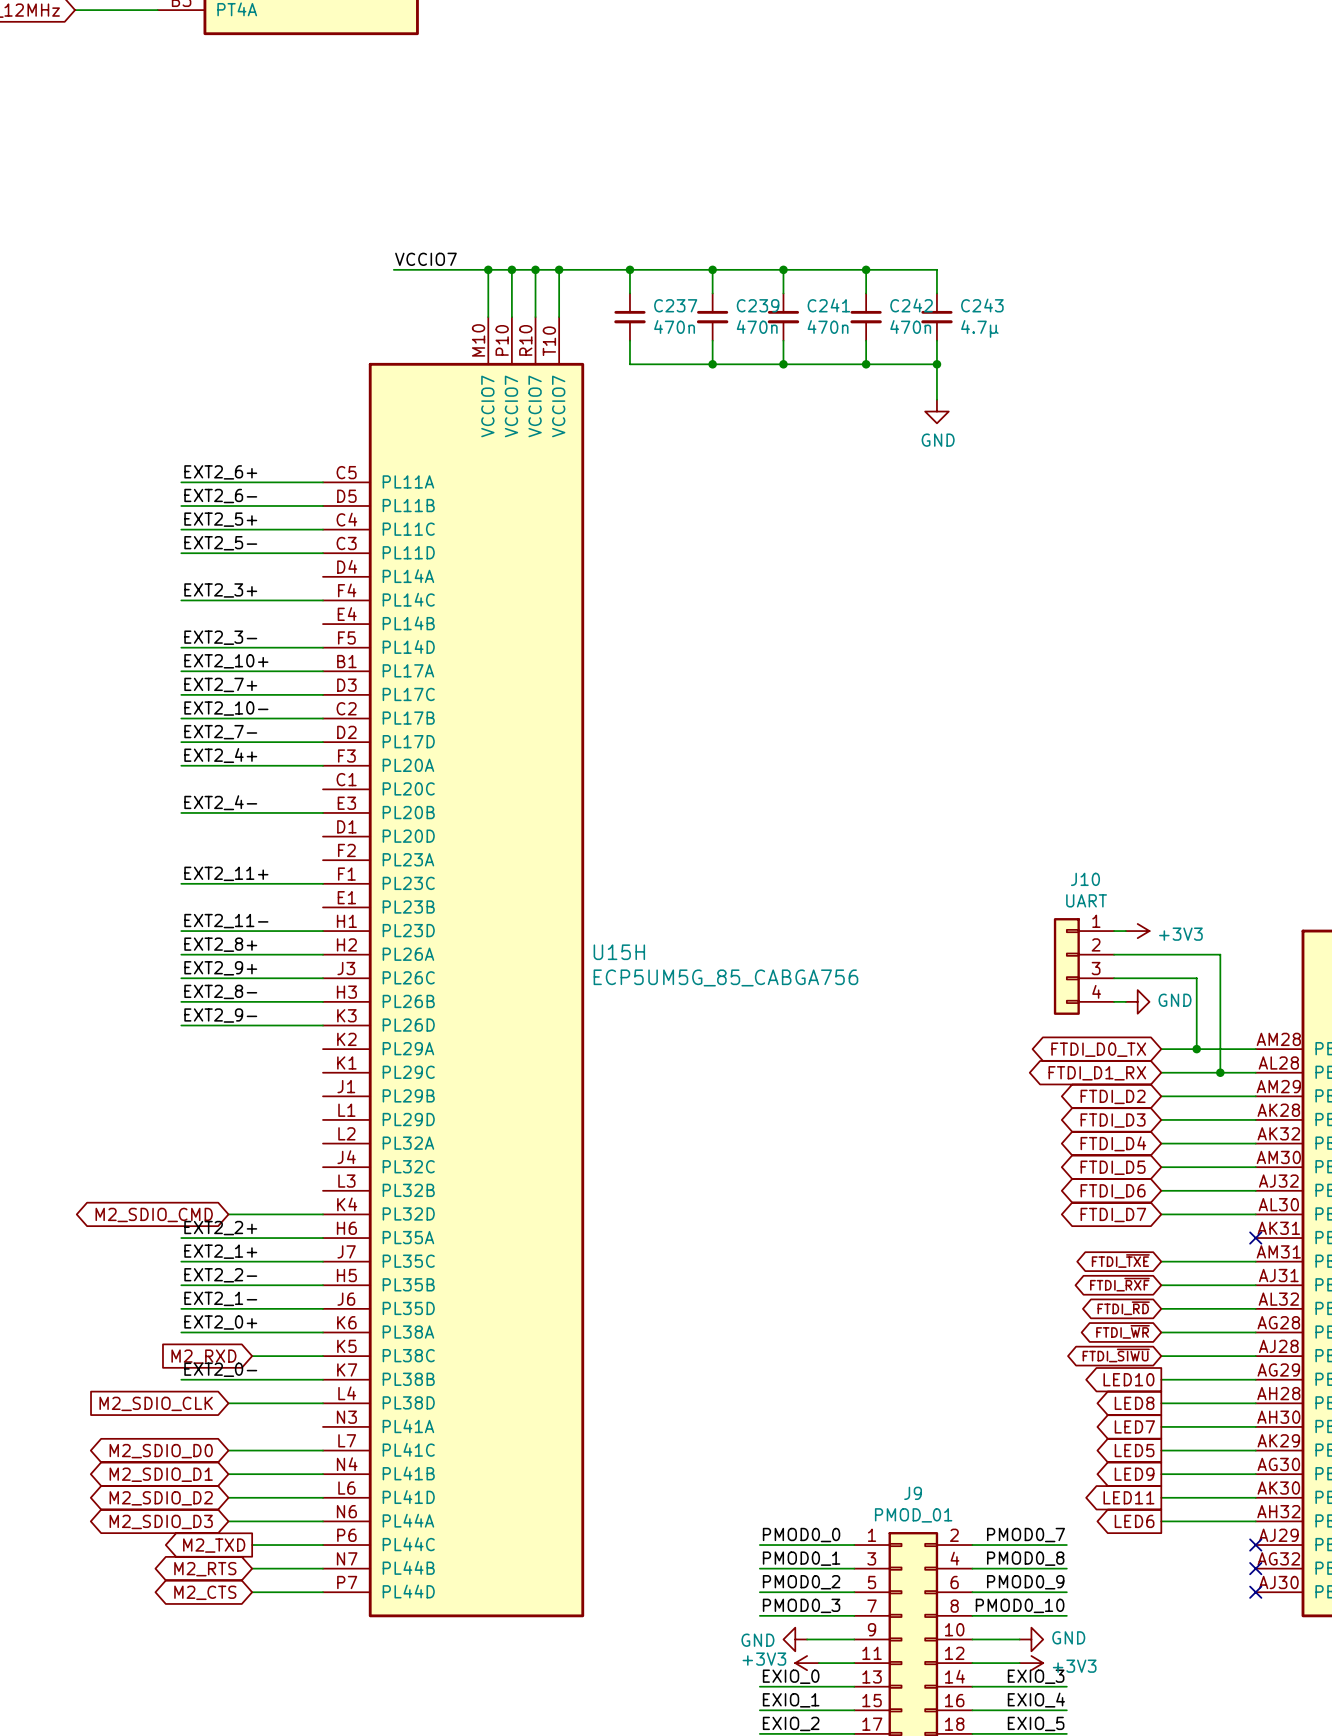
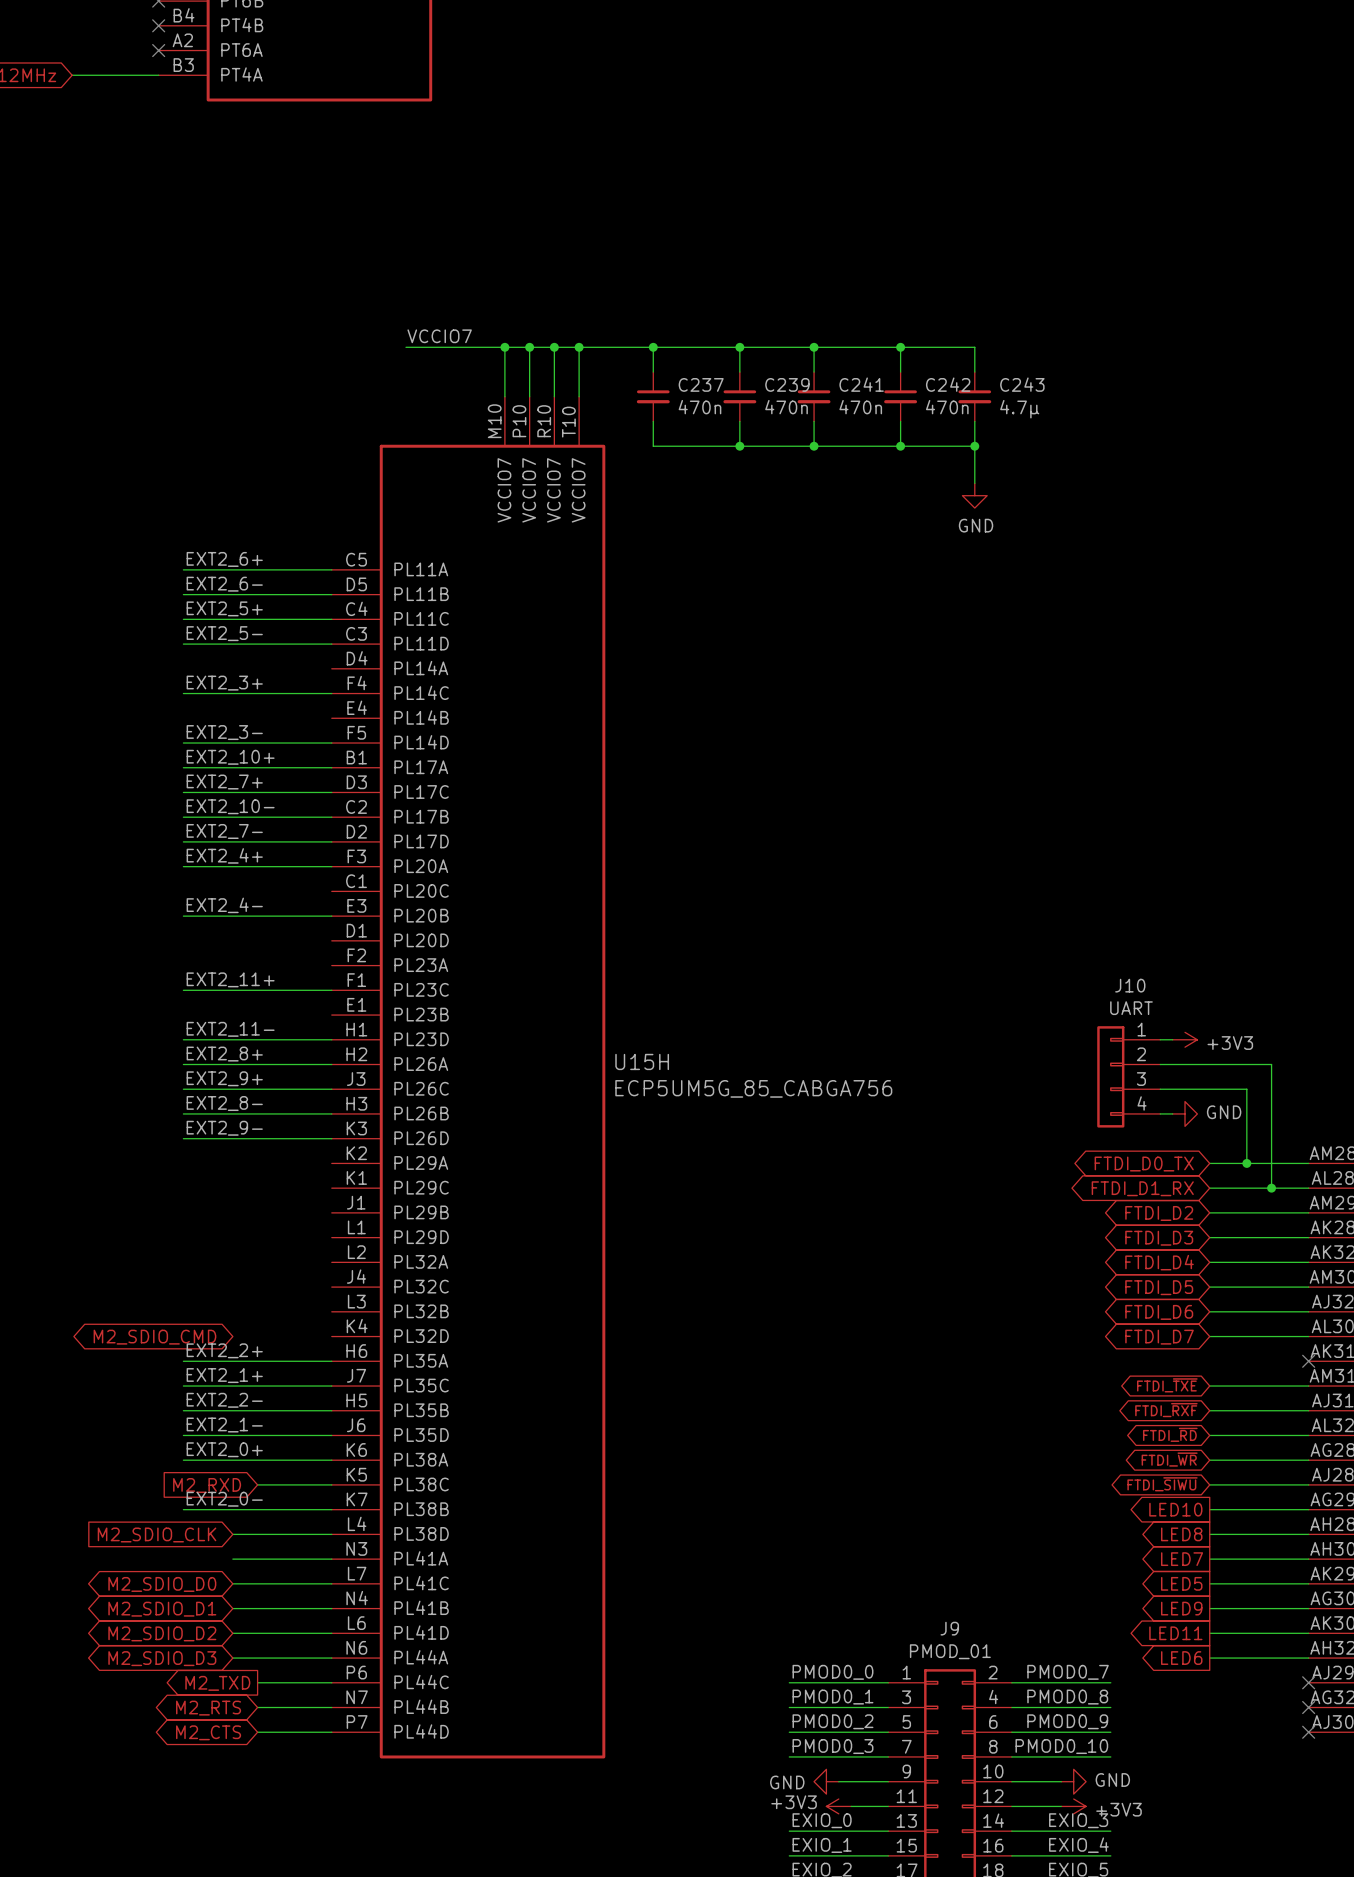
wire: (228, 1214) (322, 1214) -> (232, 1559) (331, 1559)

